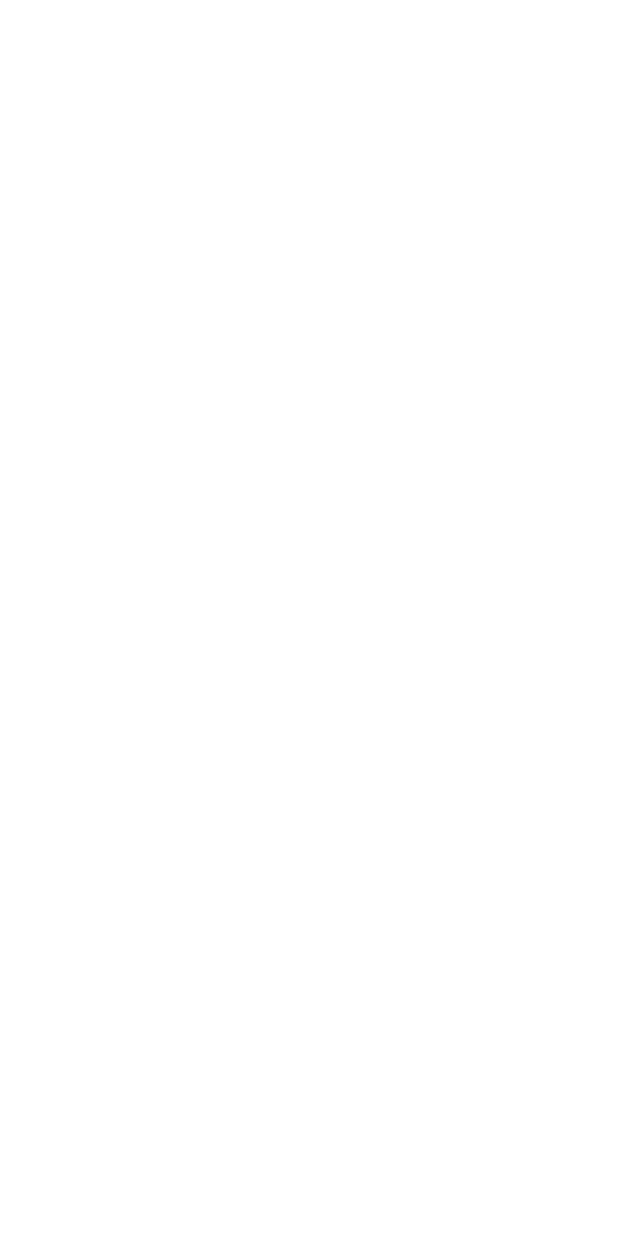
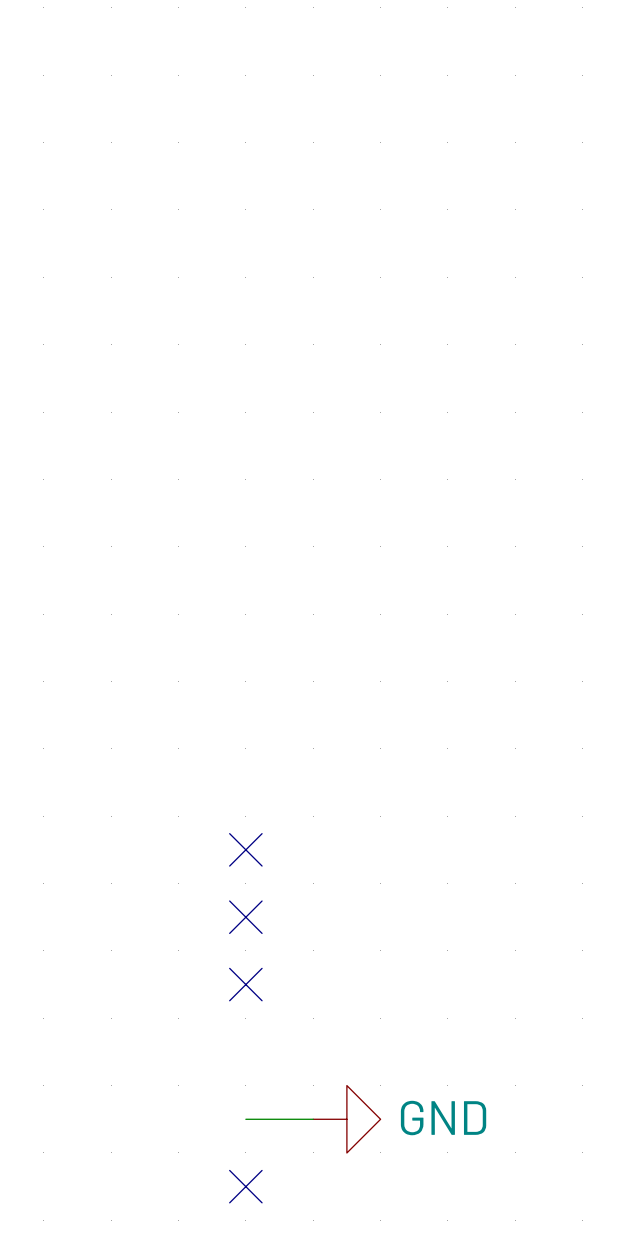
no-connect mark: none -> (245, 849)
no-connect mark: none -> (245, 917)
no-connect mark: none -> (245, 984)
wire: none -> (245, 1119) (313, 1119)
power symbol: none -> GND (346, 1119)
no-connect mark: none -> (245, 1186)

